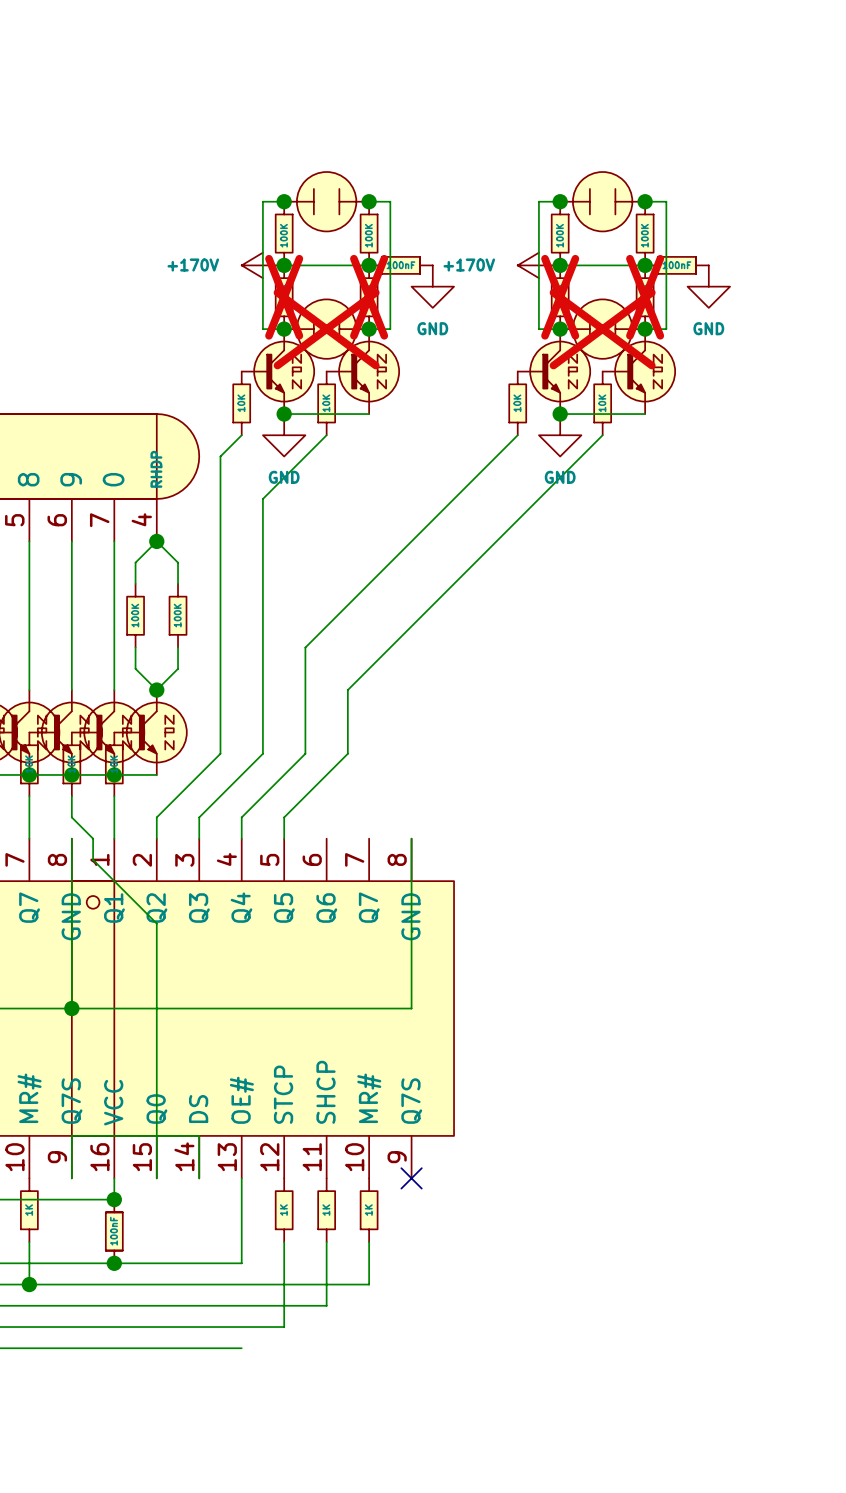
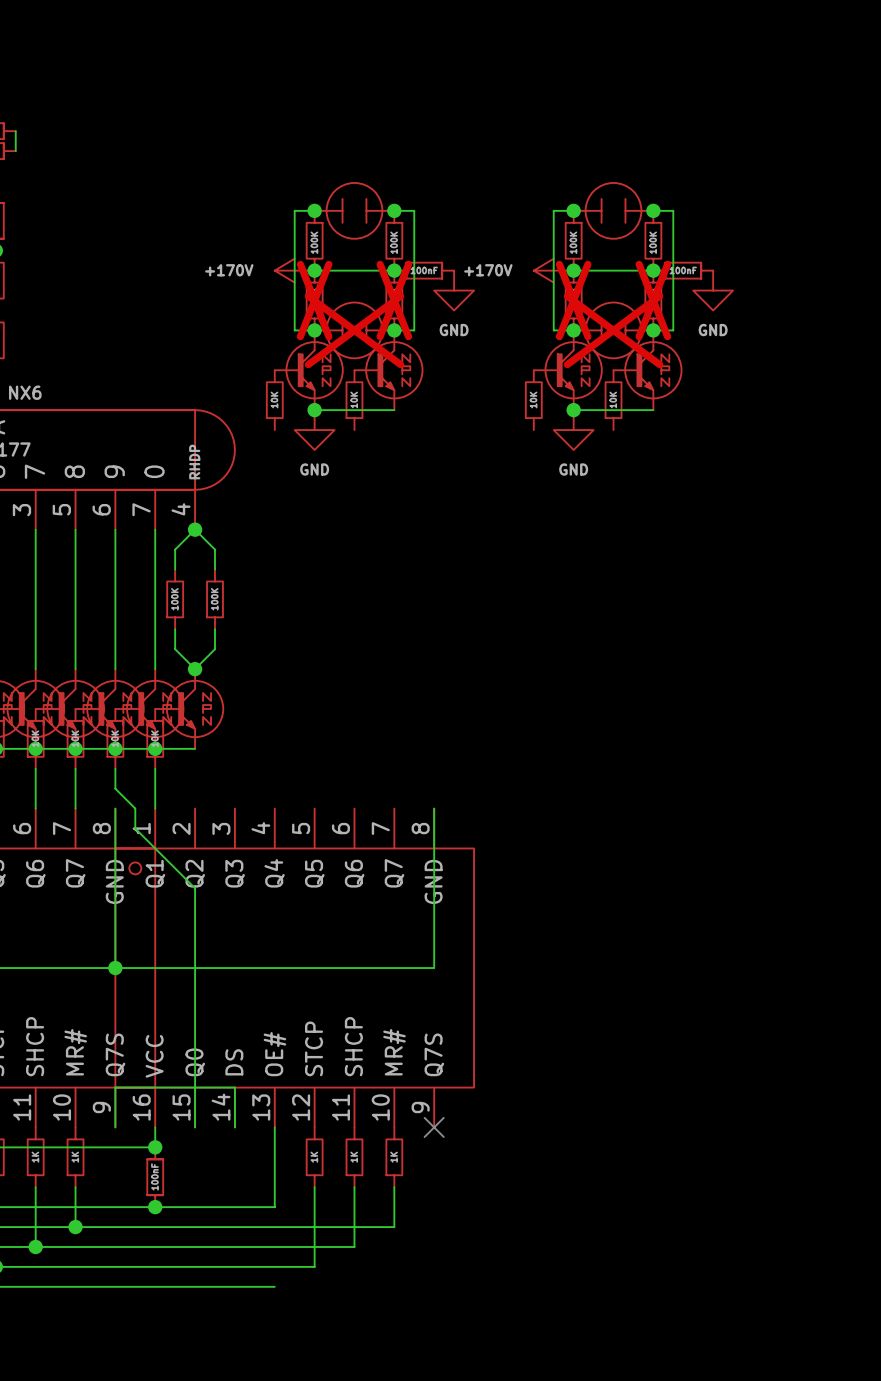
wire: (241, 435) (220, 456) (220, 753) (156, 817) (156, 838) -> none
wire: (326, 435) (262, 498) (262, 753) (199, 817) (199, 838) -> none
wire: (517, 435) (305, 647) (305, 753) (241, 817) (241, 838) -> none
wire: (602, 435) (347, 690) (347, 753) (284, 817) (284, 838) -> none

